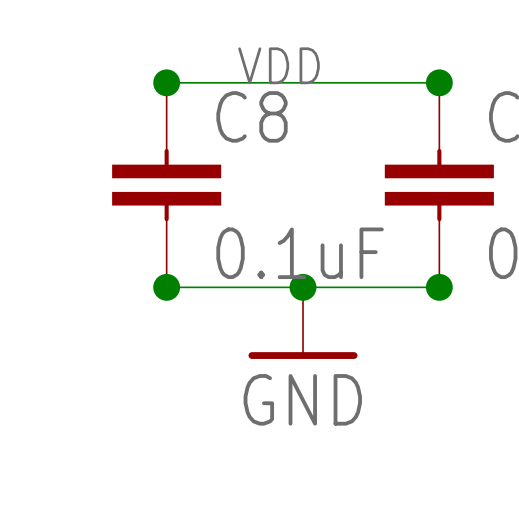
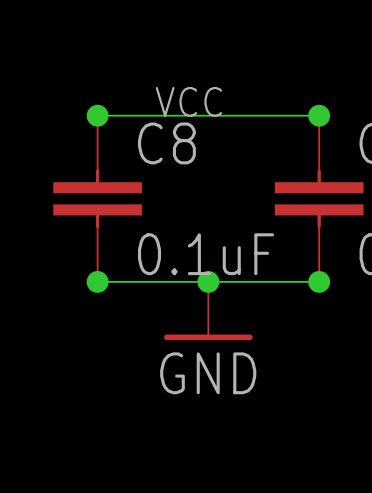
label: VDD (278, 65) -> VCC (188, 101)

